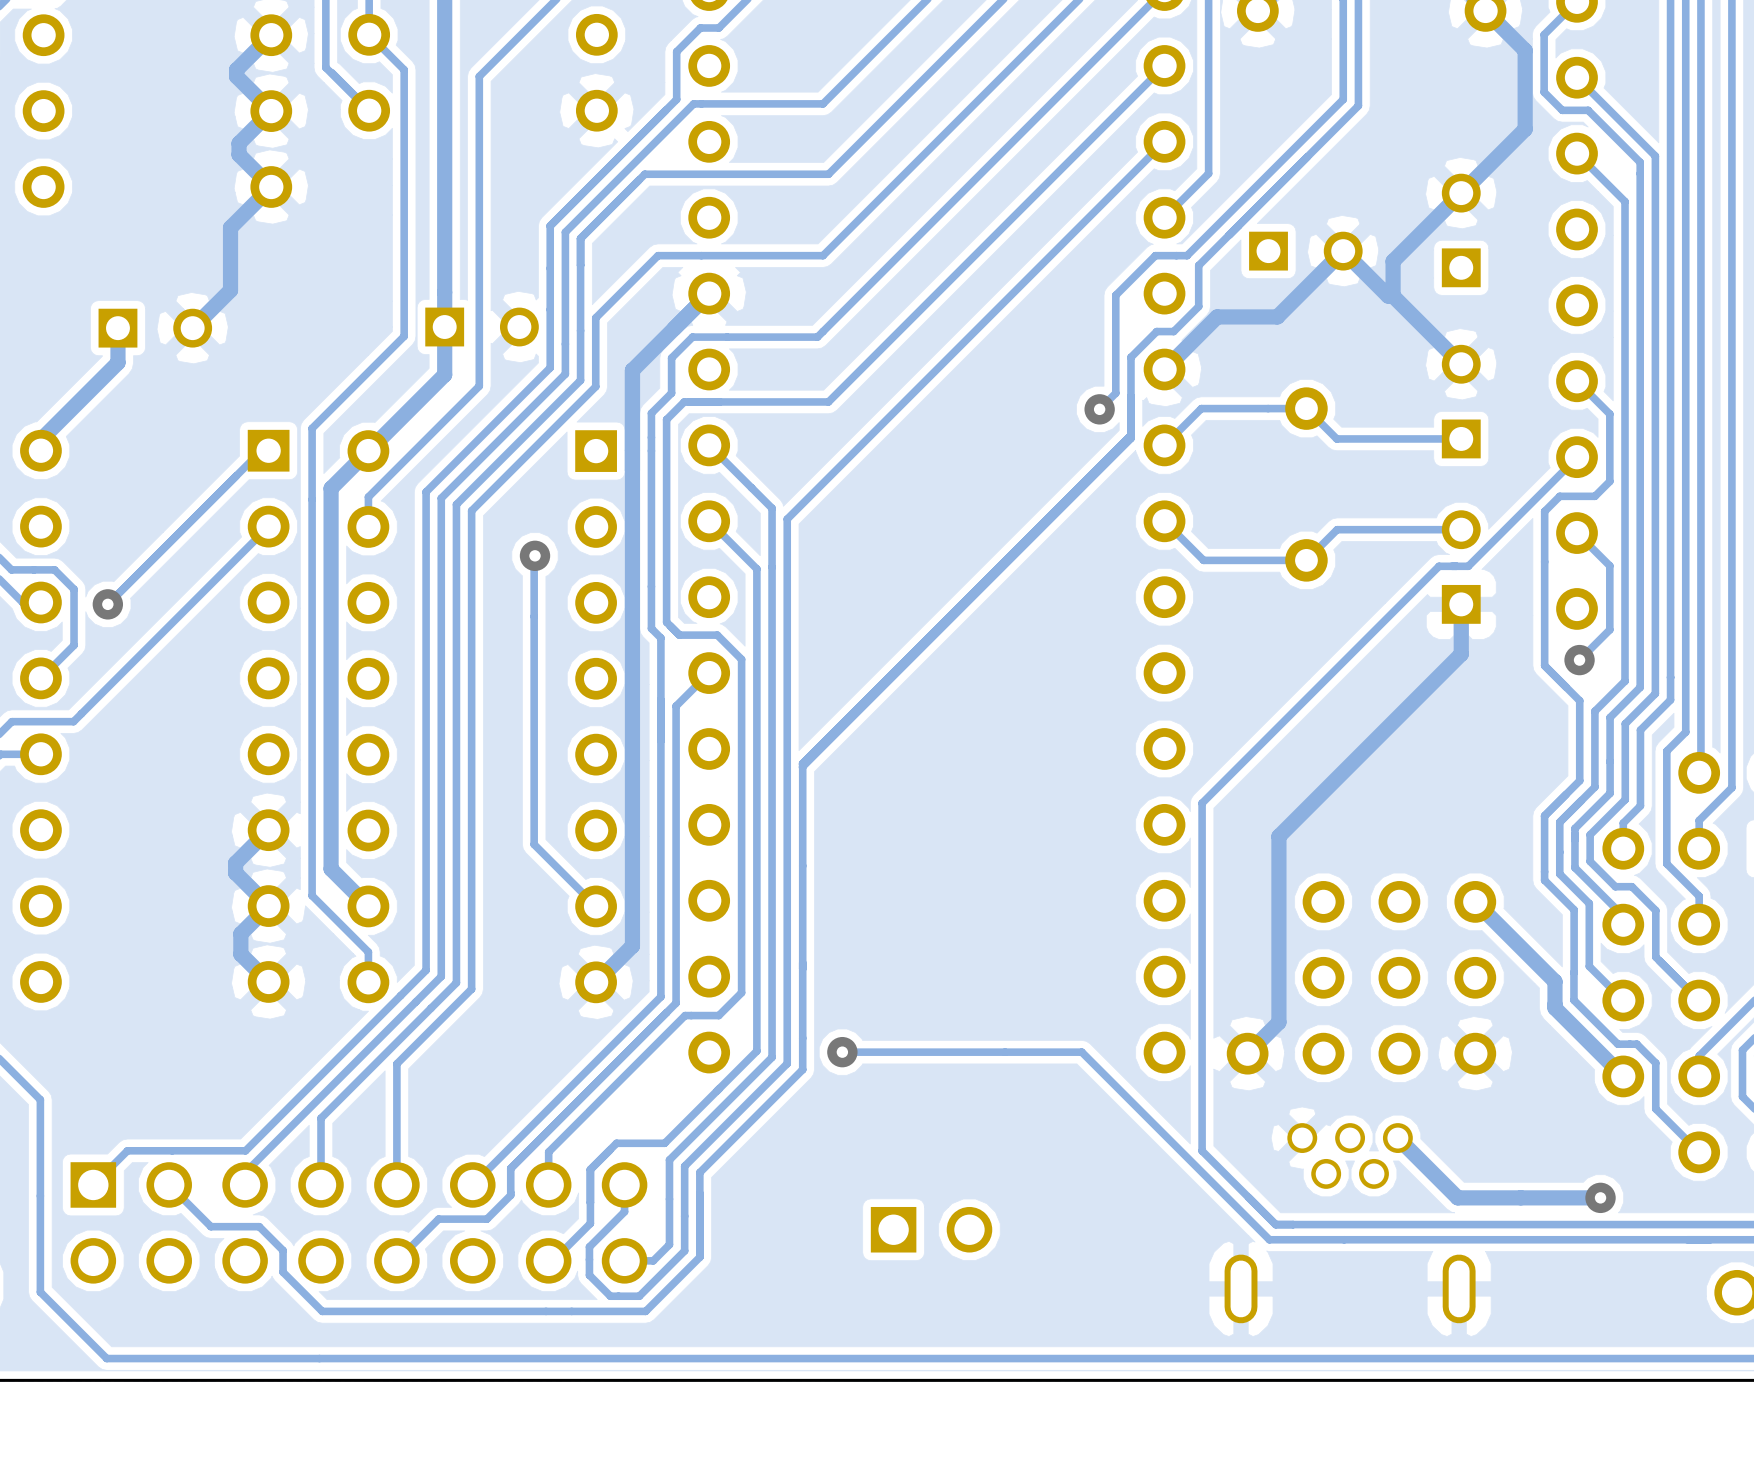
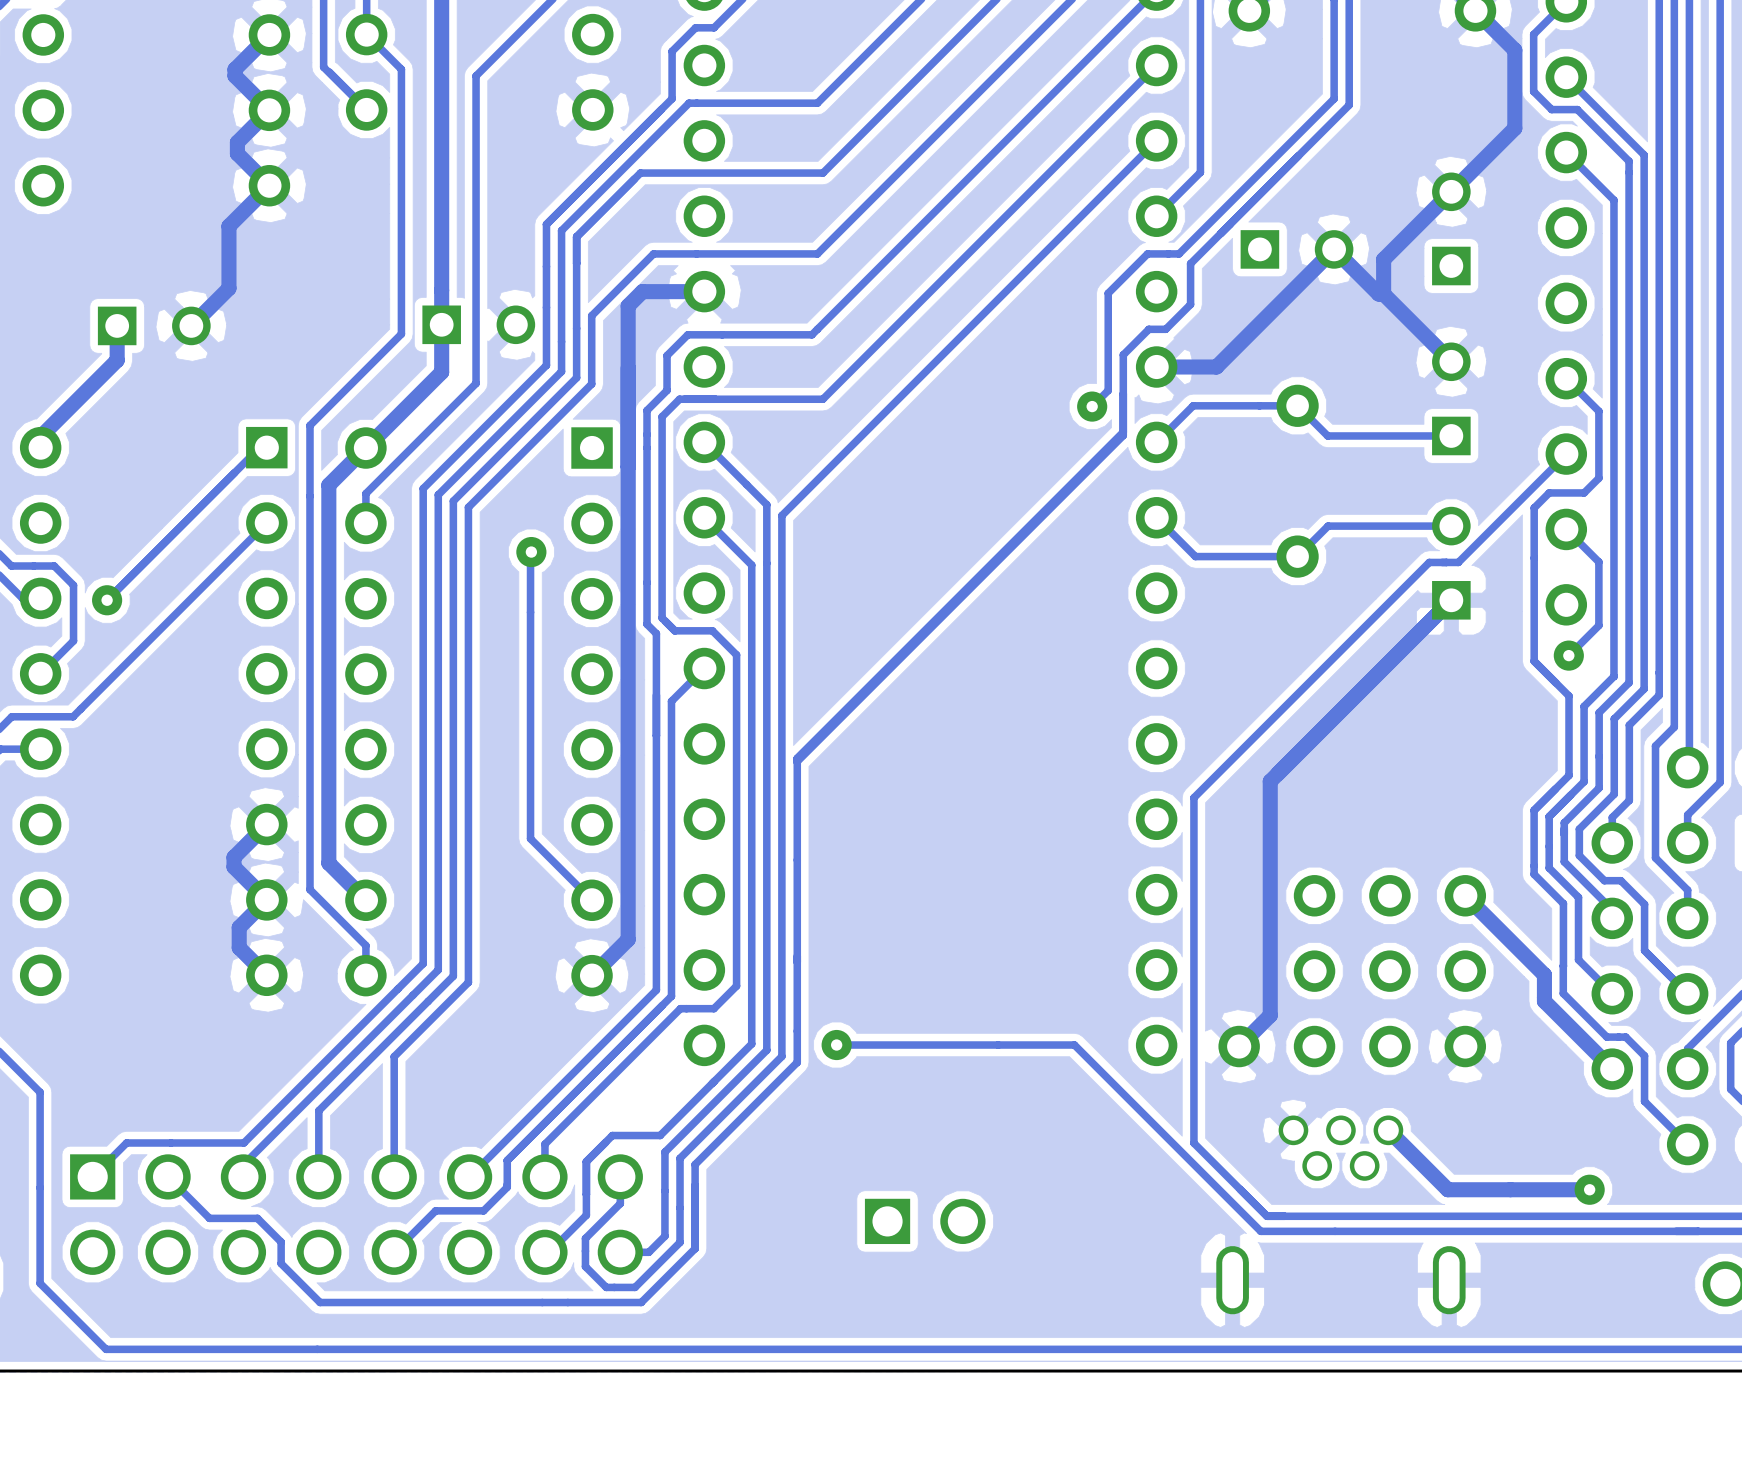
track: (709, 293) (632, 370) -> (704, 291) (642, 291) (628, 305) (628, 367)
track: (1277, 316) (1217, 316) (1164, 369) -> (1268, 314) (1216, 367) (1156, 367)
track: (1461, 604) (1461, 654) (1278, 836) -> (1451, 600) (1270, 781) (1270, 830)

